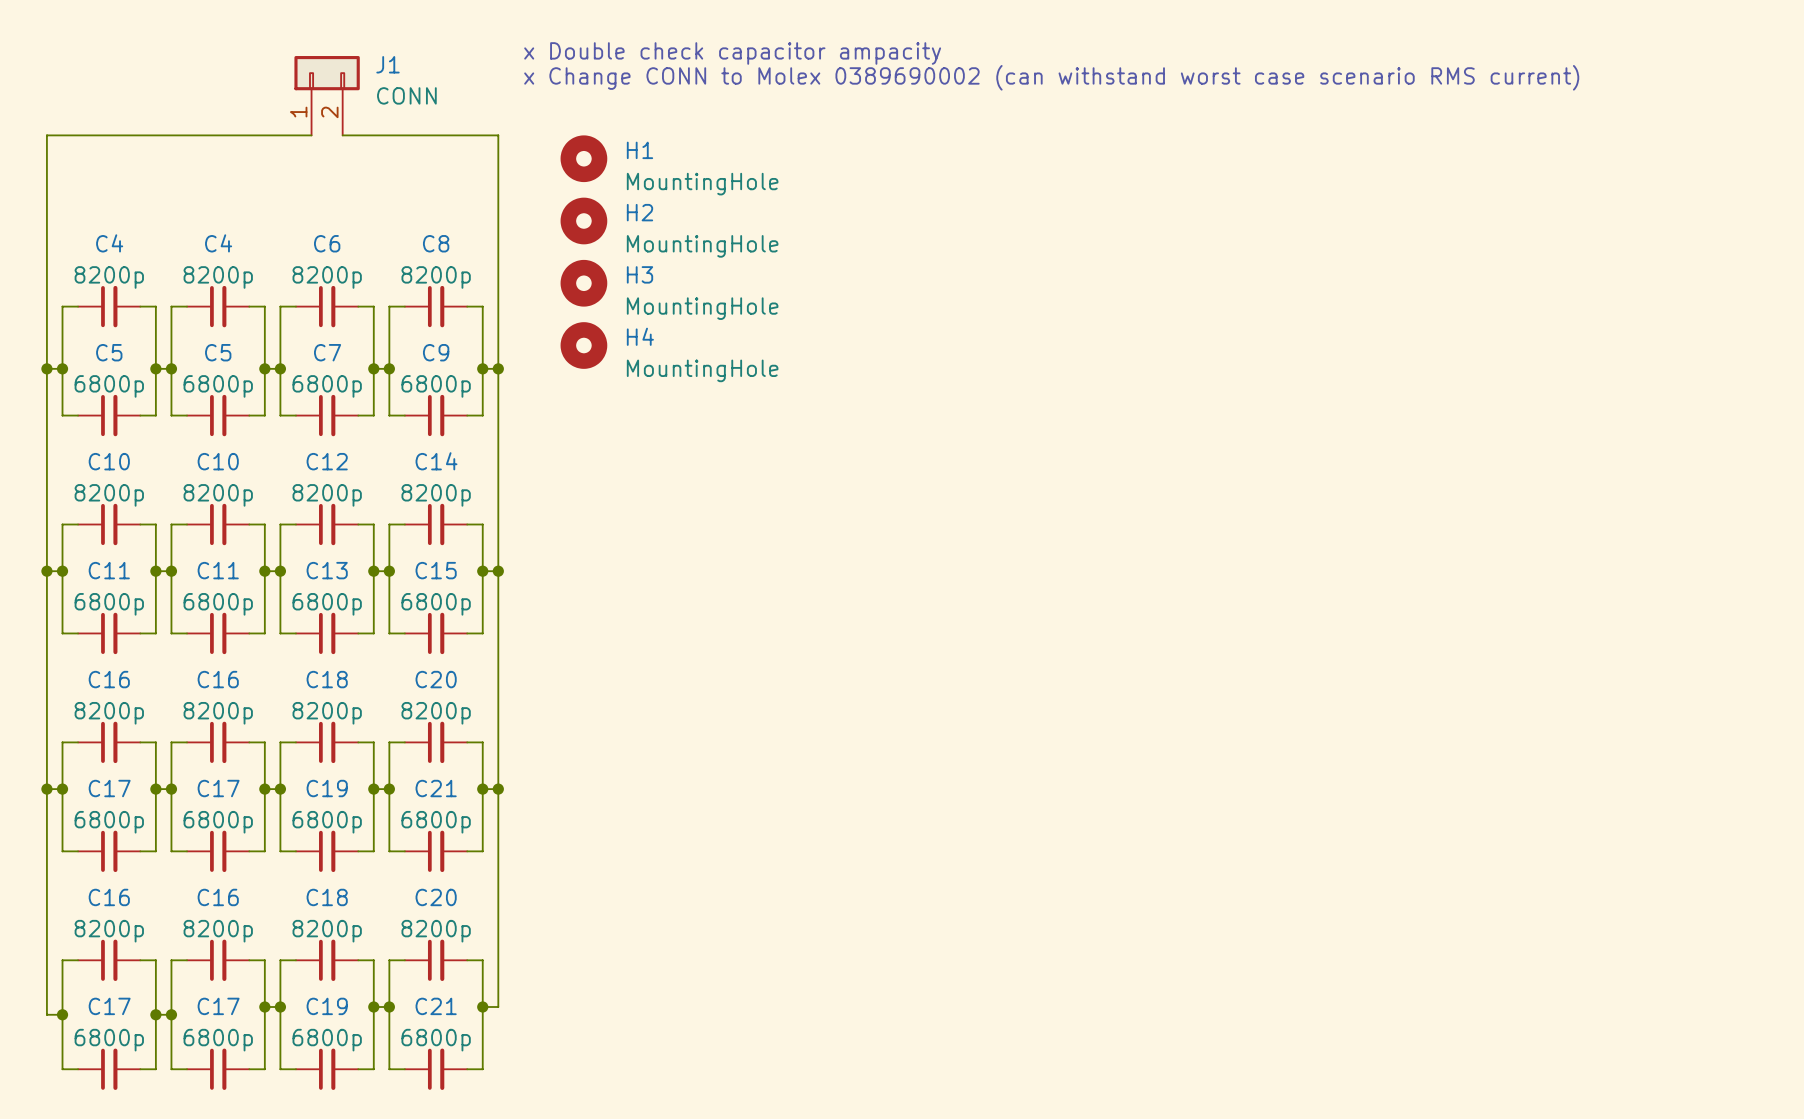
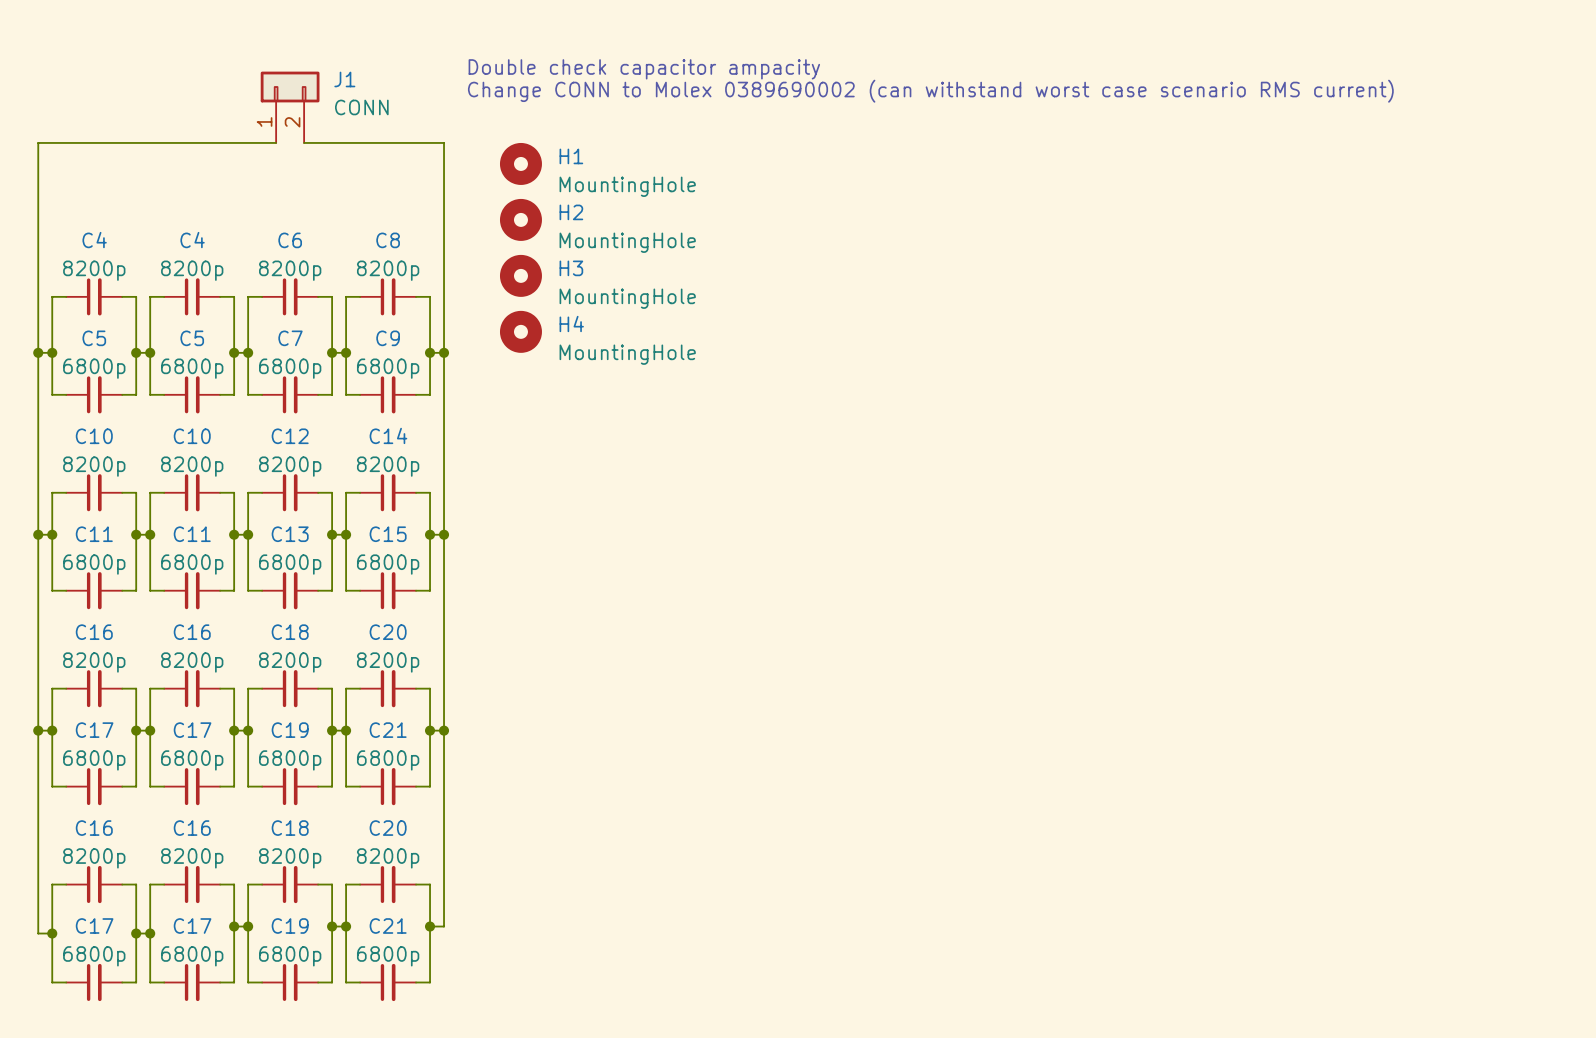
text: x Double check capacitor ampacity (732, 53) -> Double check capacitor ampacity (644, 69)
text: x Change CONN to Molex 0389690002 (can withstand worst case scenario RMS current) (1051, 77) -> Change CONN to Molex 0389690002 (can withstand worst case scenario RMS current) (930, 91)

